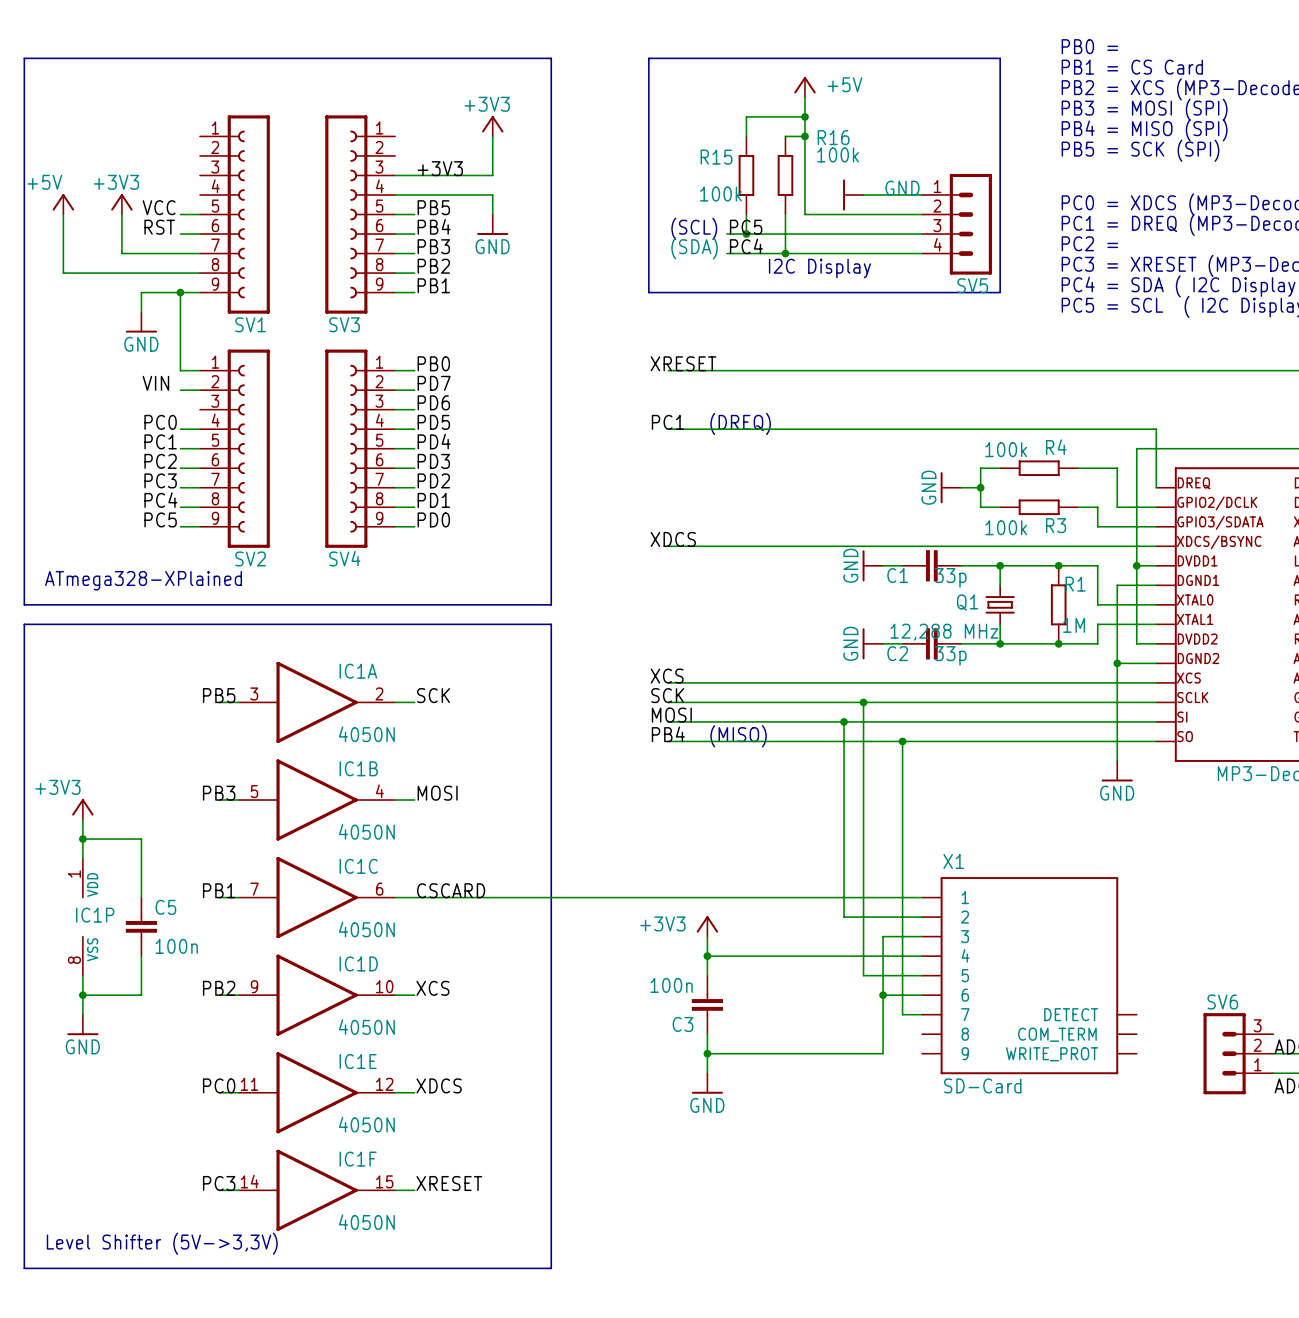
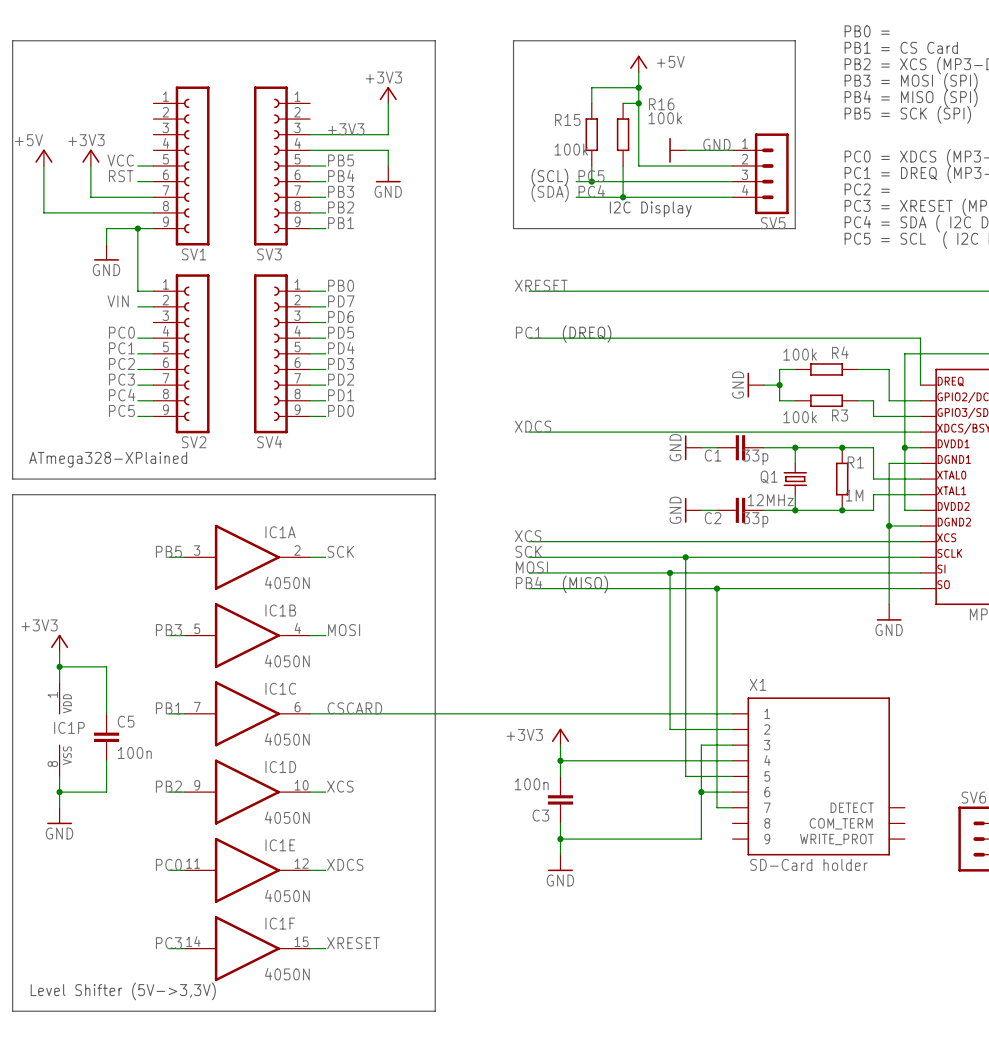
Q1 value: 12,288 MHz (944, 632) -> 12MHz (770, 500)
X1 value: SD-Card (982, 1085) -> SD-Card holder (808, 864)

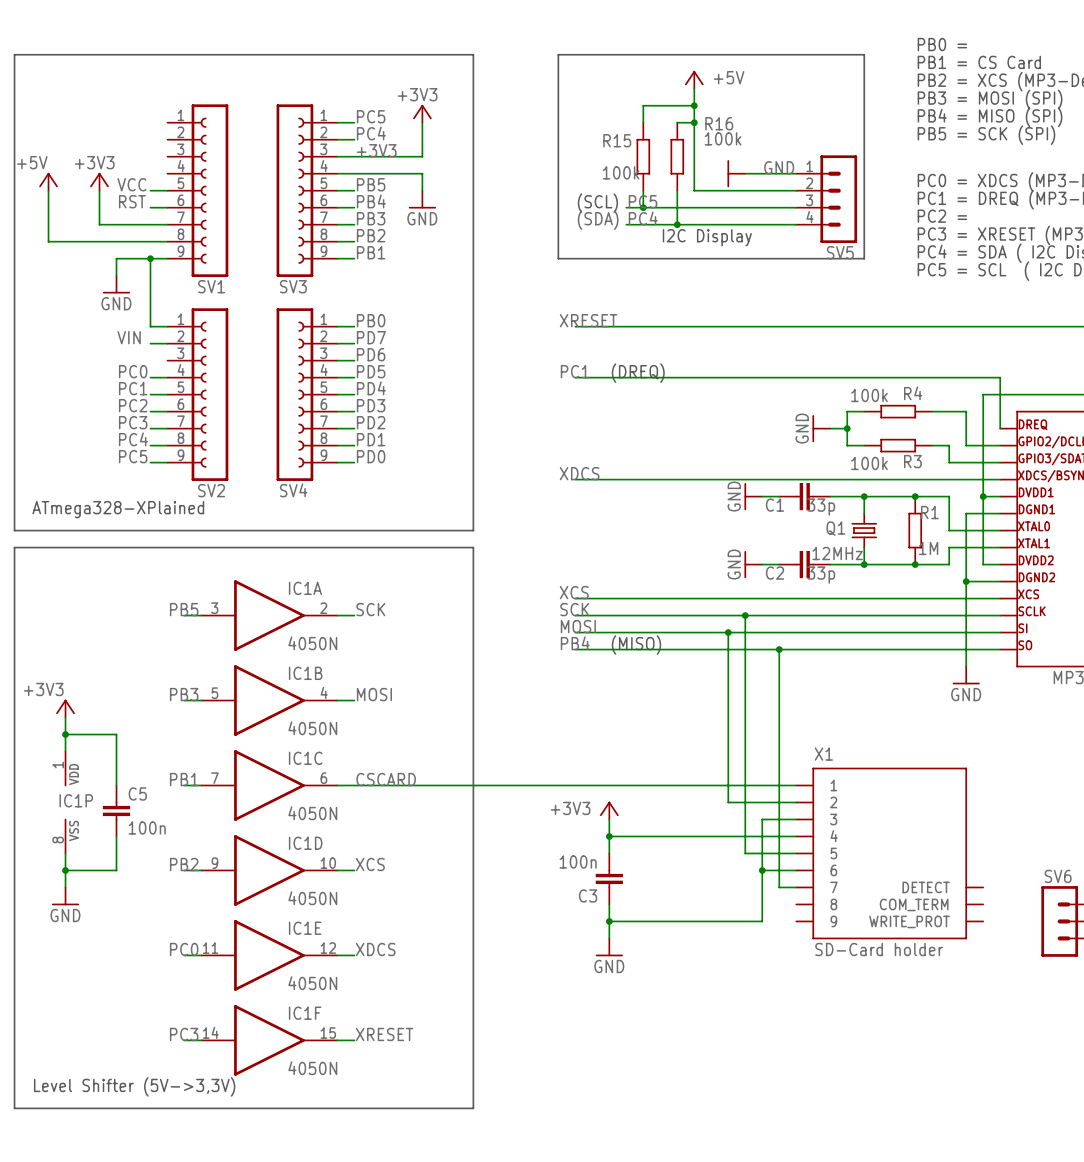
label: none -> PC5 (371, 116)
wire: none -> (337, 122) (354, 122)
label: none -> PC4 (371, 133)
wire: none -> (337, 139) (354, 139)

